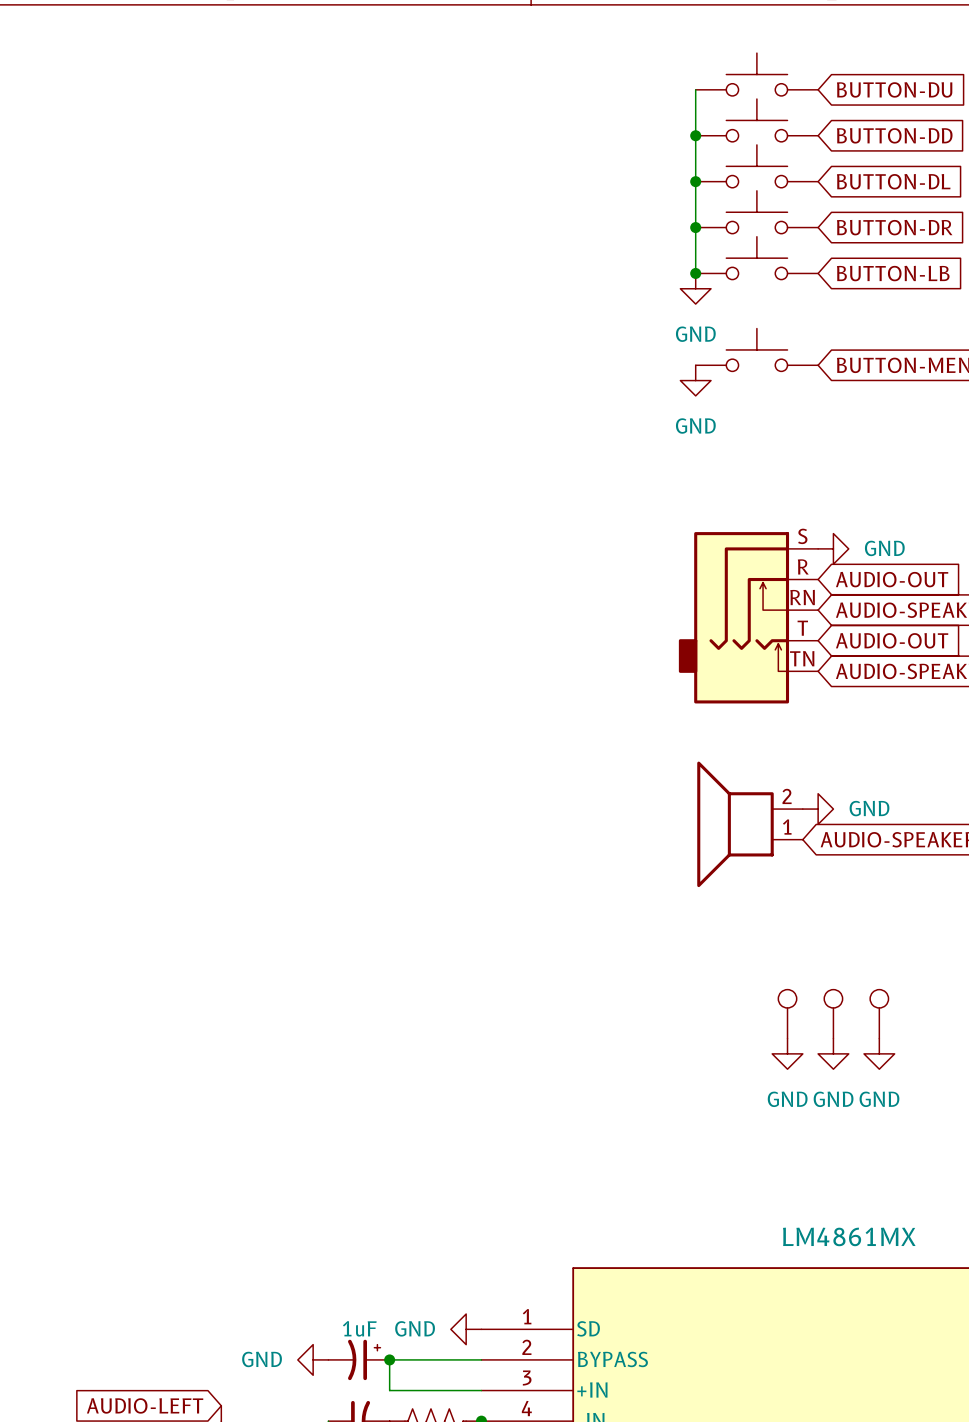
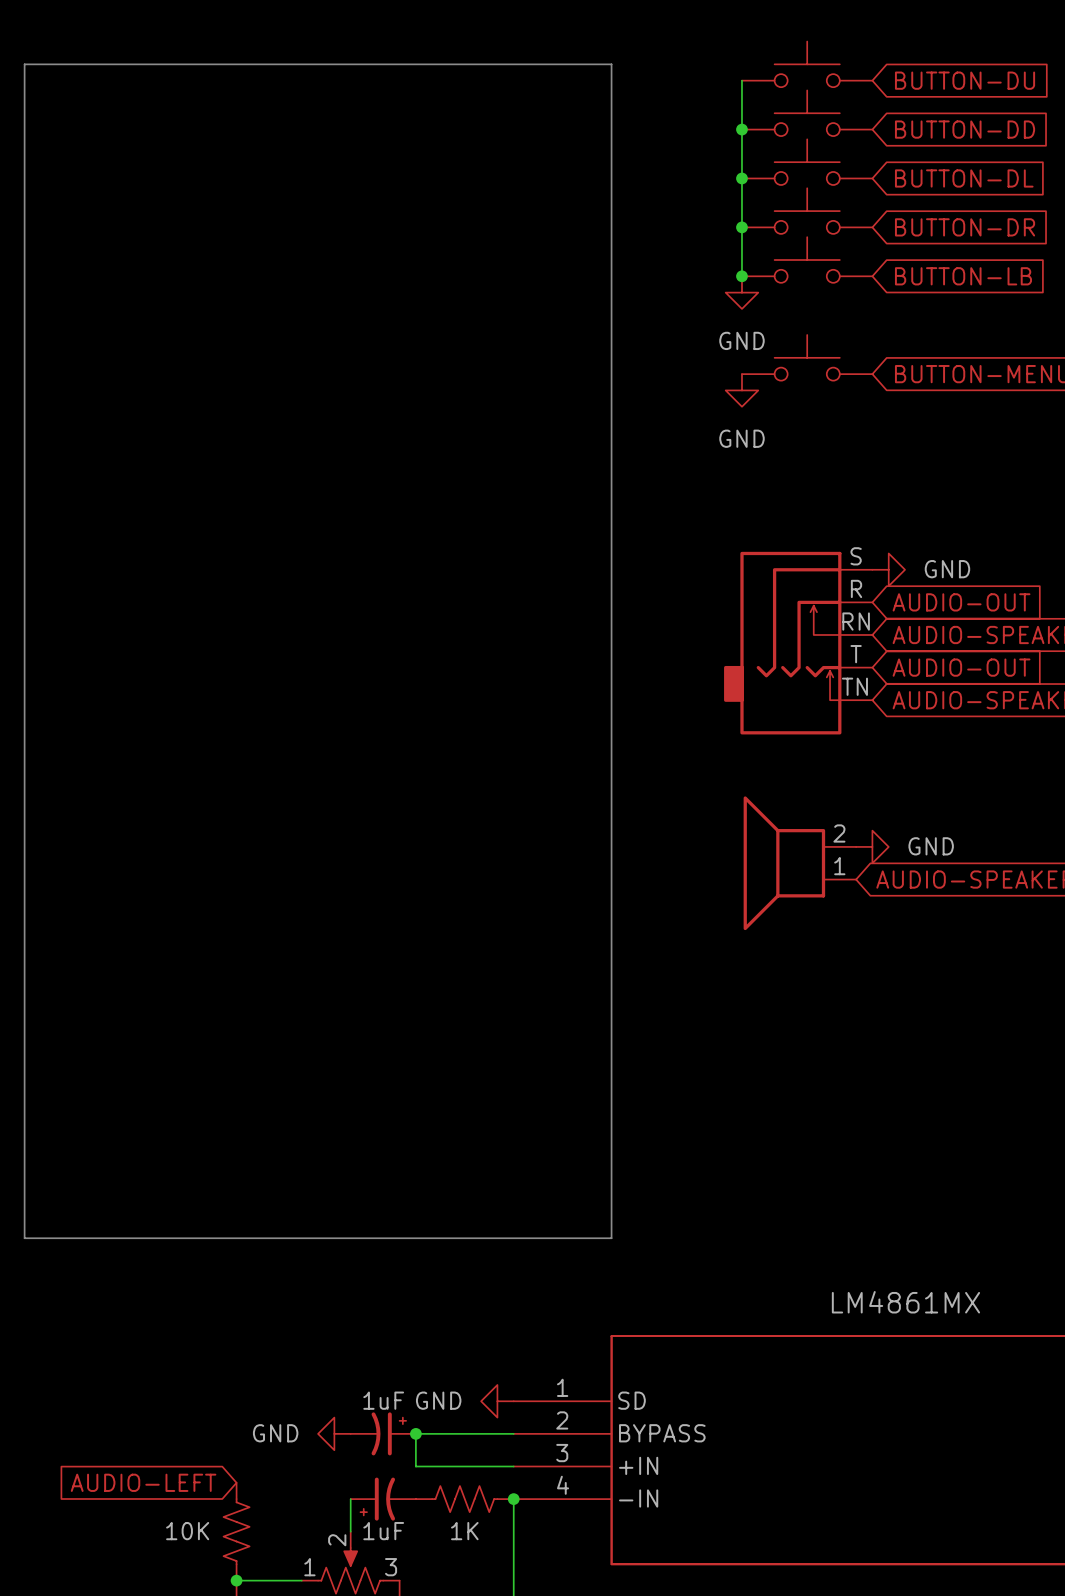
line: none -> (24, 64) (611, 64) (611, 1238) (24, 1238) (24, 64)
part: (787, 1014) -> none
part: (833, 1014) -> none
part: (879, 1014) -> none
power symbol: GND (787, 1053) -> none
power symbol: GND (833, 1053) -> none
power symbol: GND (879, 1053) -> none

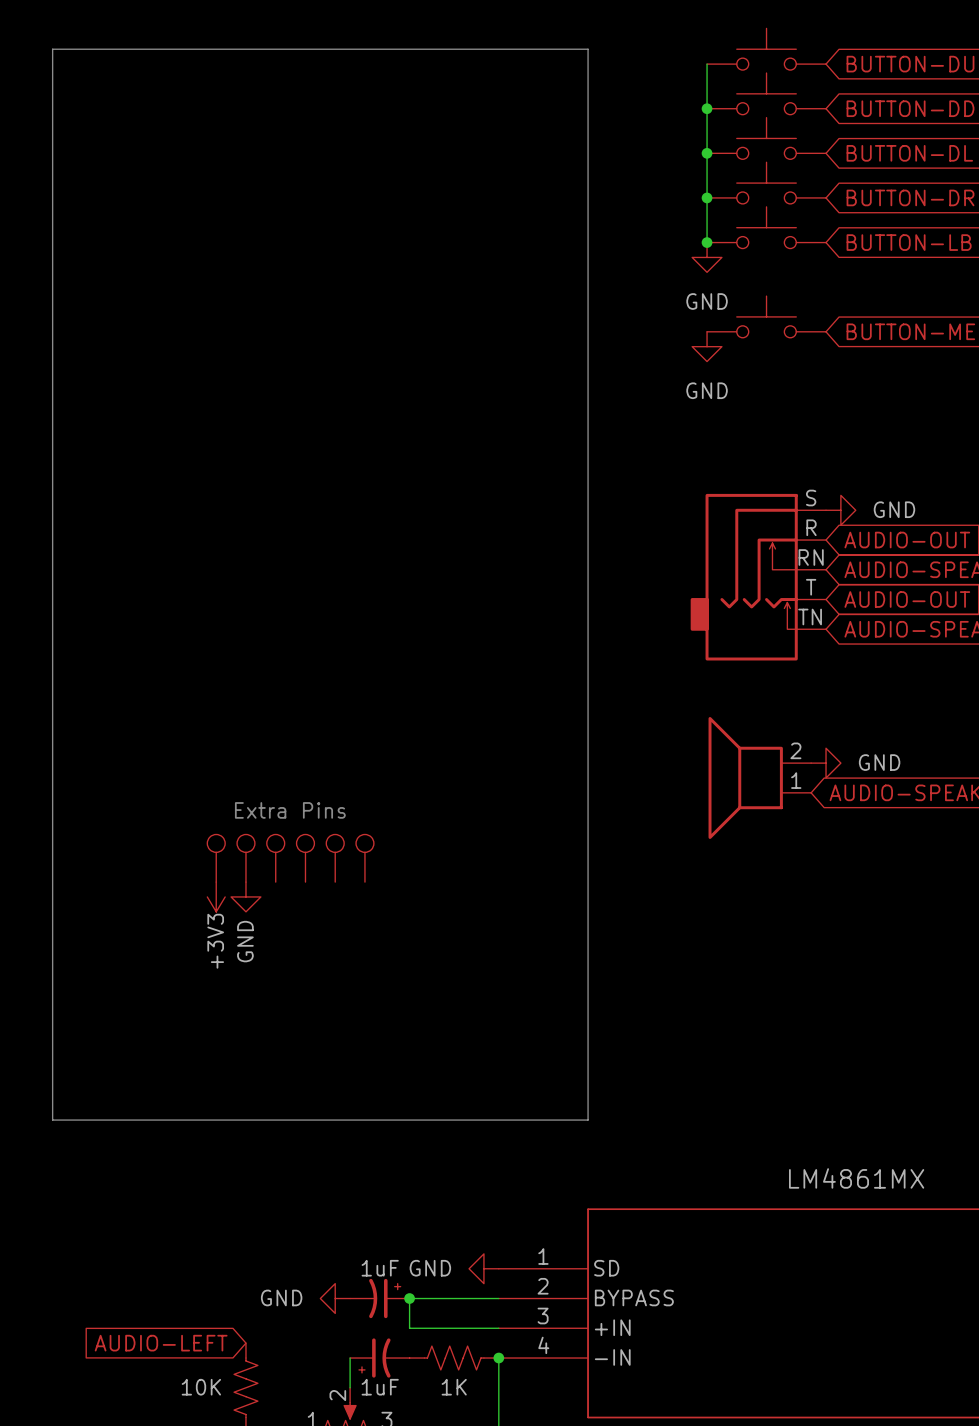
text: none -> Extra Pins (290, 810)
part: none -> (216, 858)
part: none -> (245, 858)
part: none -> (275, 858)
part: none -> (305, 858)
part: none -> (335, 858)
part: none -> (364, 858)
power symbol: none -> +3V3 (216, 896)
power symbol: none -> GND (245, 896)

